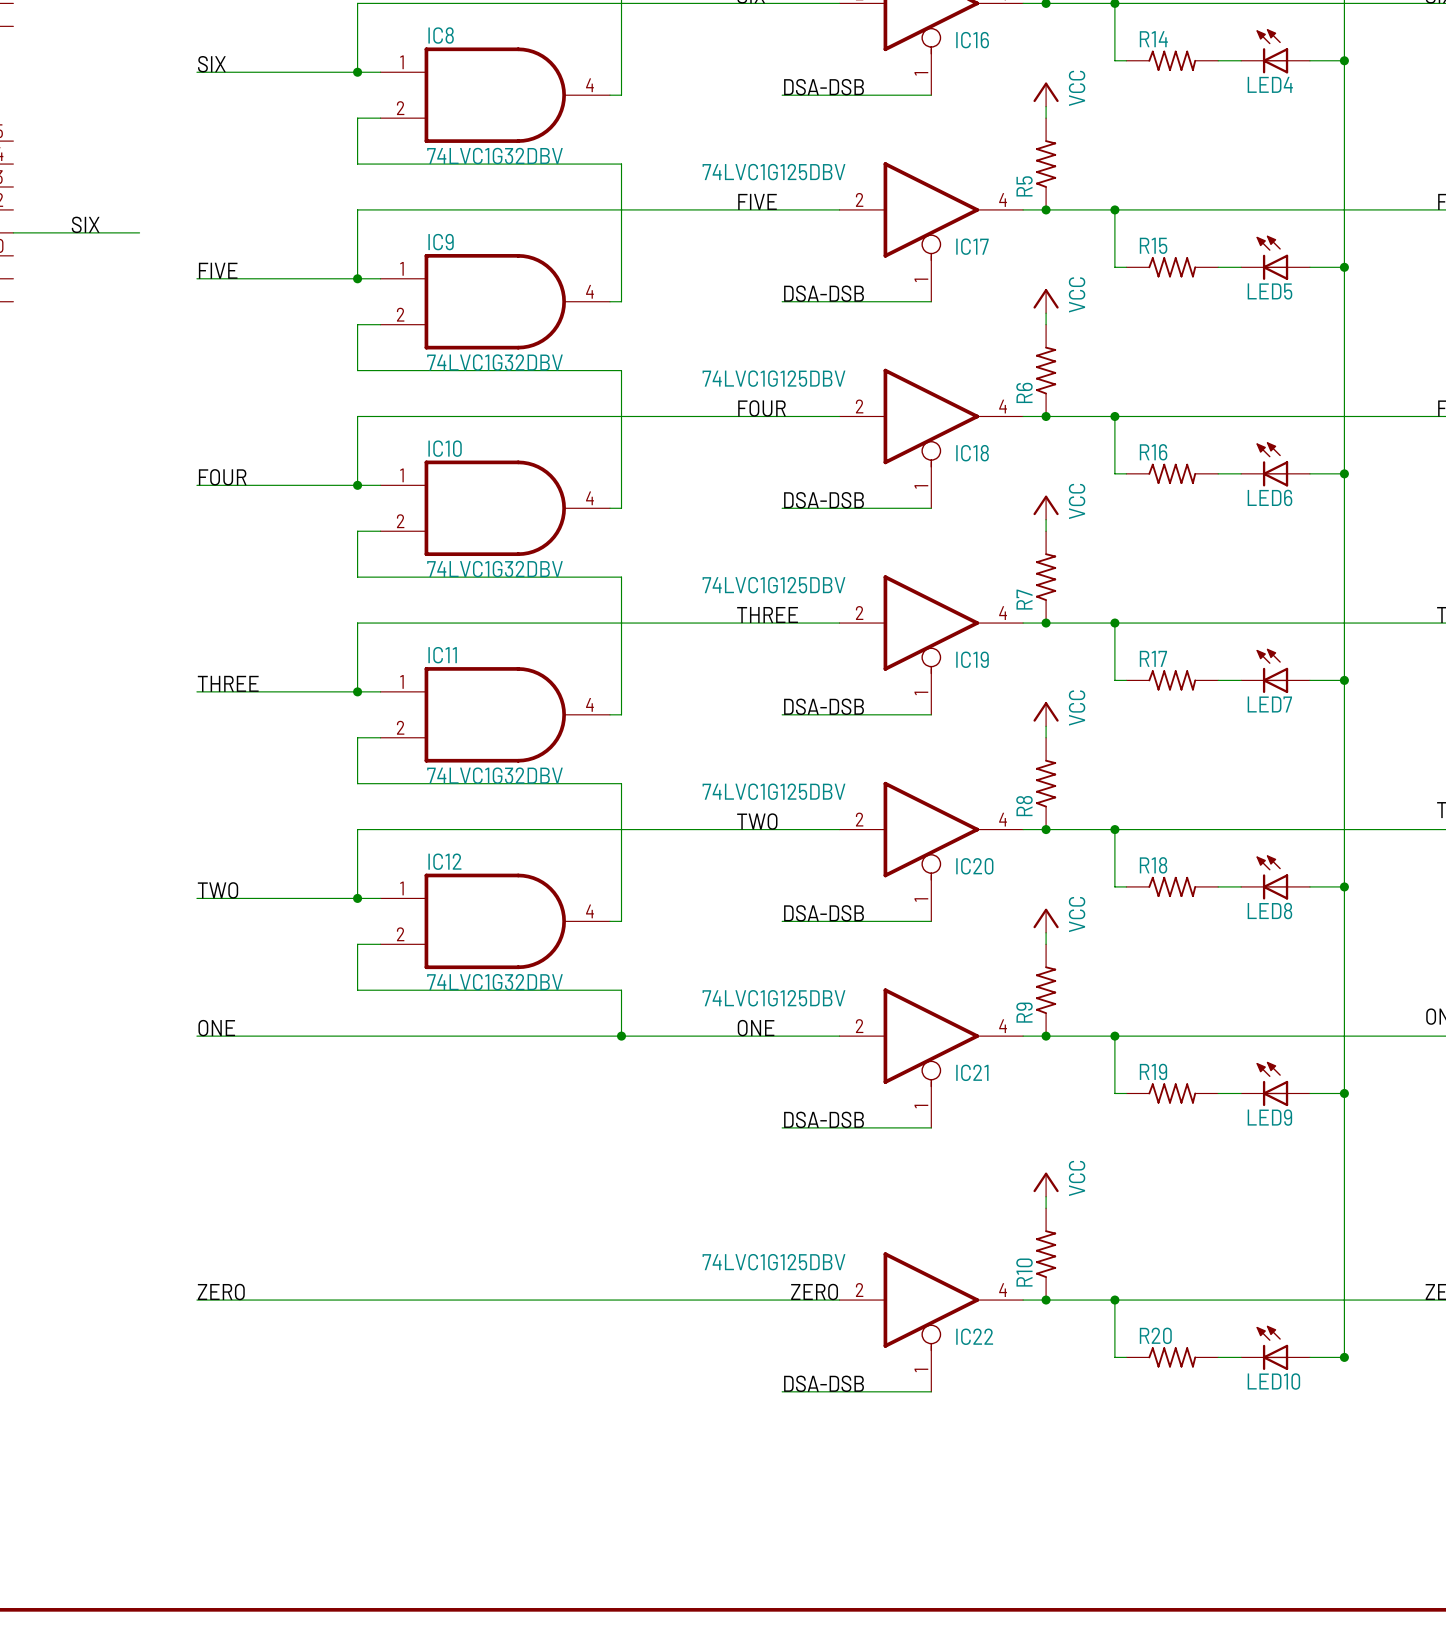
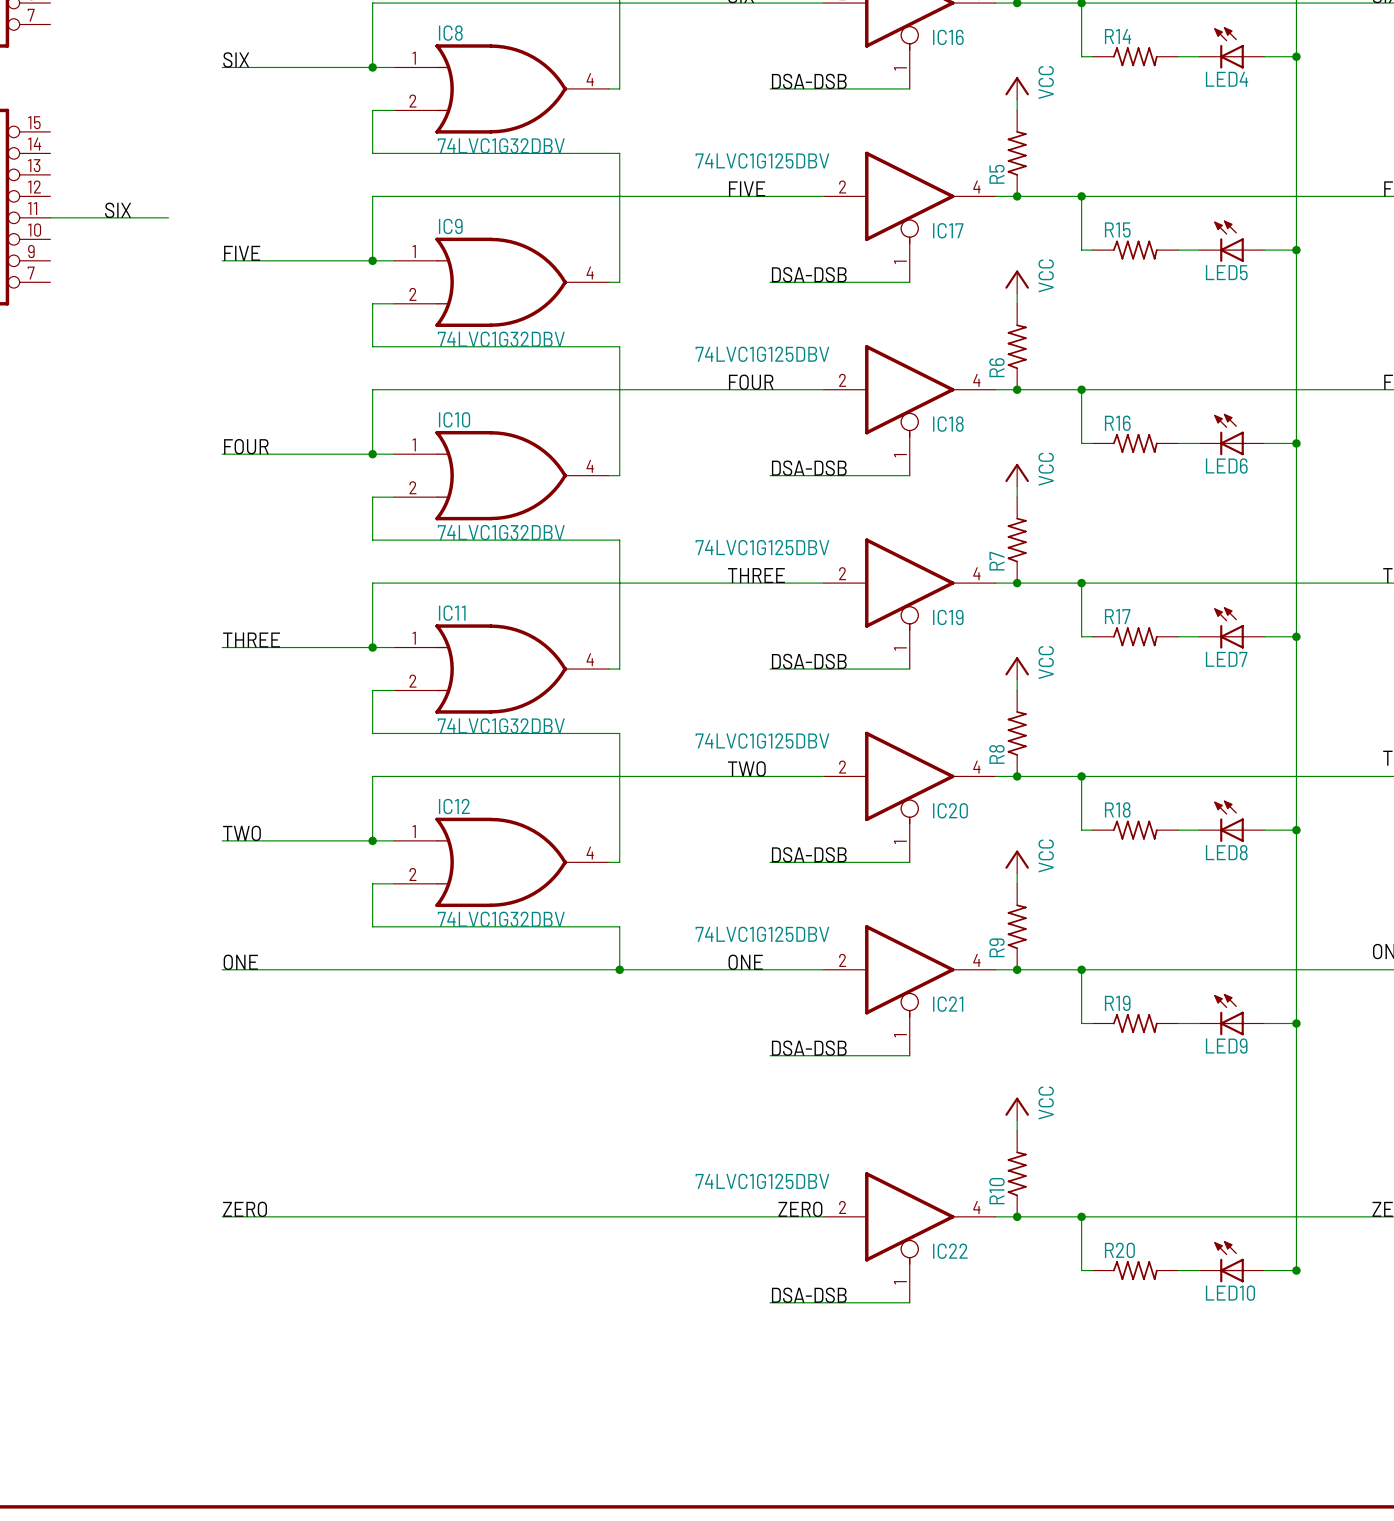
IC8 symbol: [380, 47, 611, 143] -> [394, 44, 609, 134]
IC9 symbol: [380, 254, 611, 350] -> [394, 237, 609, 327]
IC10 symbol: [380, 460, 611, 557] -> [394, 430, 609, 521]
IC11 symbol: [380, 667, 611, 763] -> [394, 624, 609, 714]
IC12 symbol: [380, 873, 611, 970] -> [394, 817, 609, 908]

